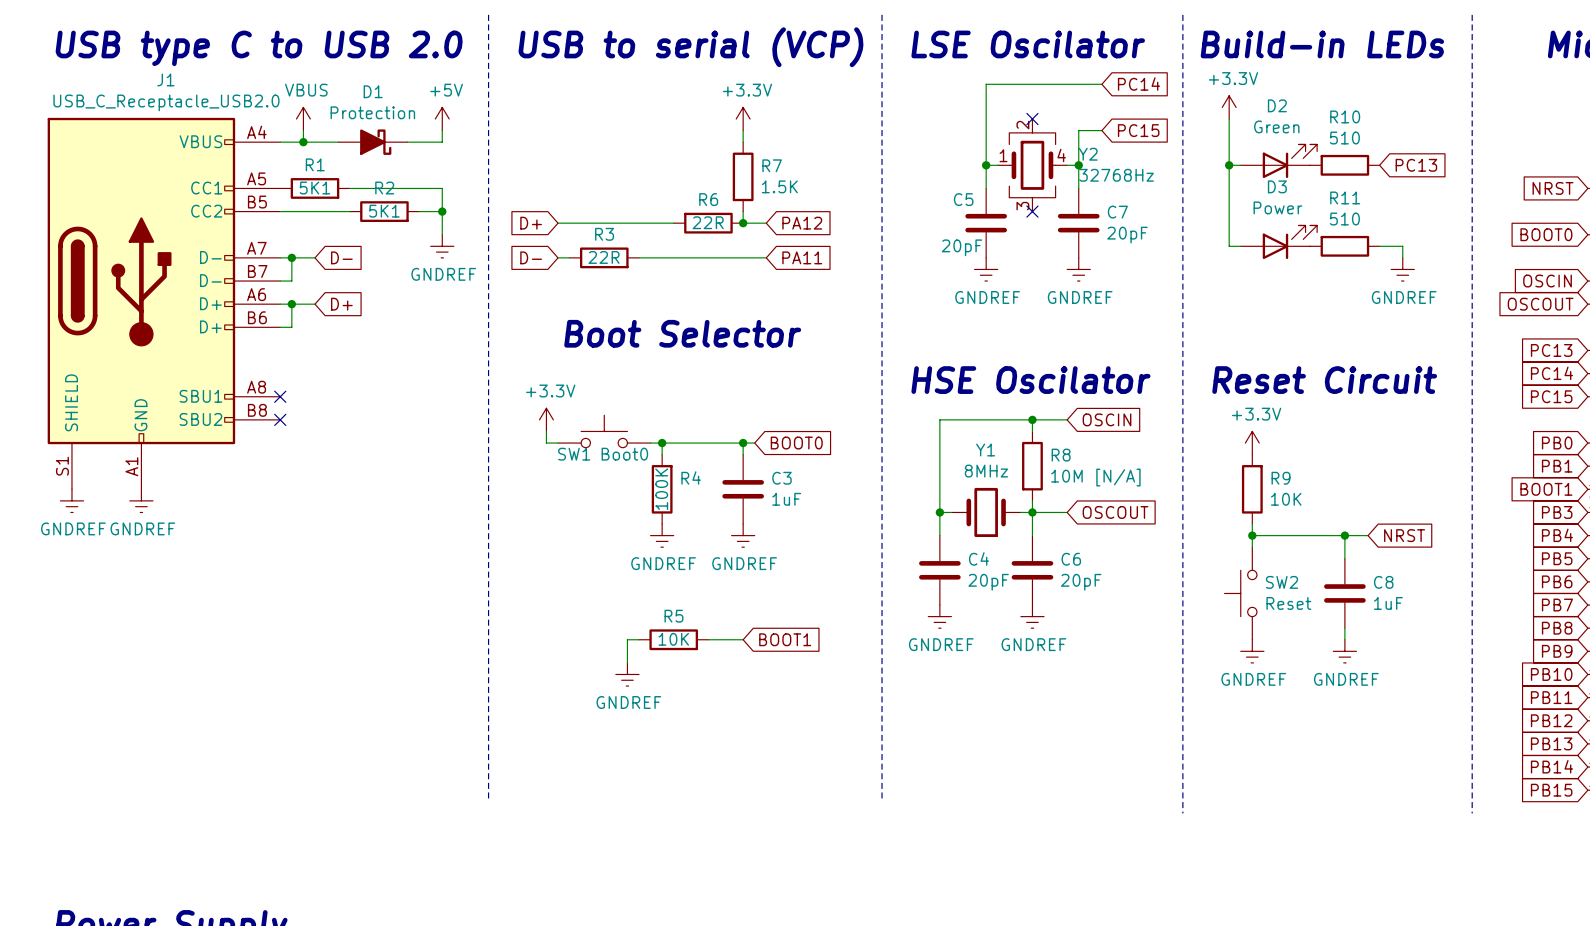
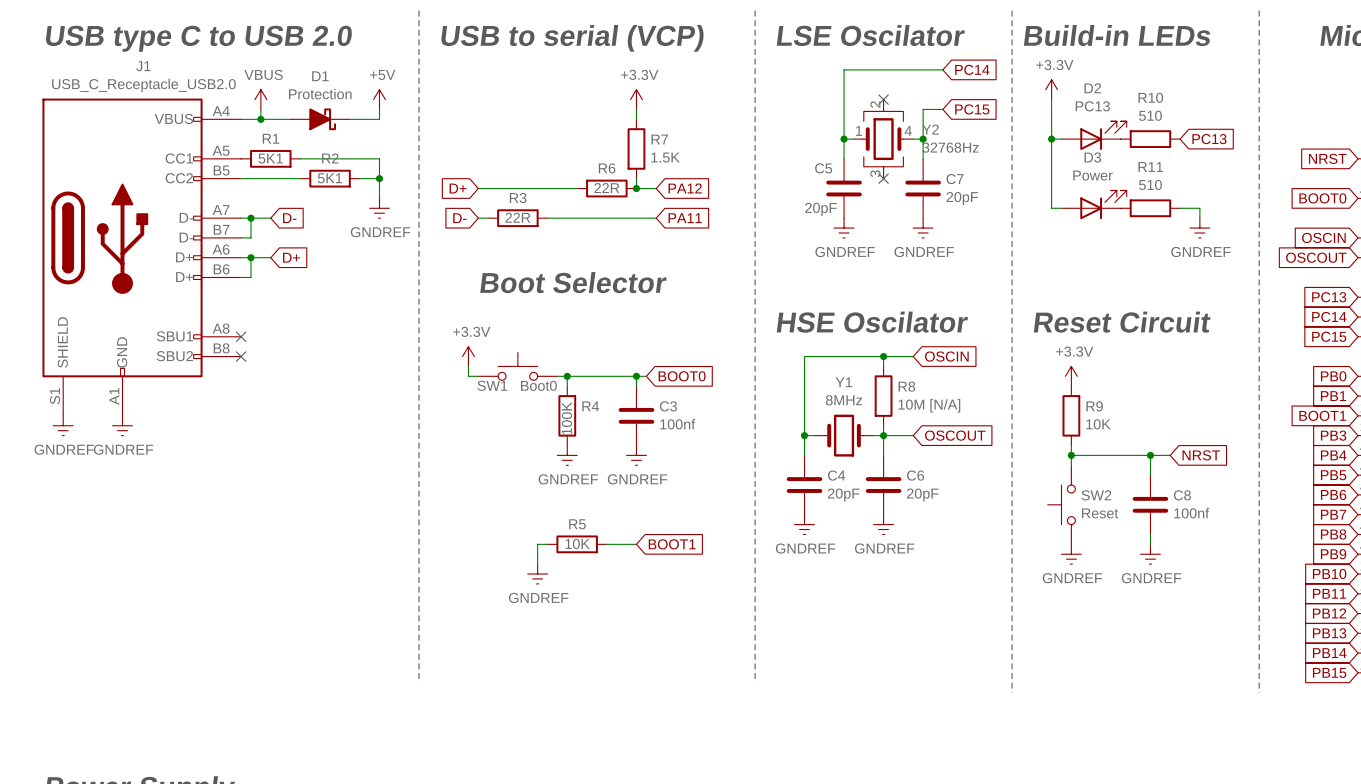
D2 value: Green (1276, 126) -> PC13 (1092, 106)
C3 value: 1uF (786, 499) -> 100nf (677, 424)
C8 value: 1uF (1388, 603) -> 100nf (1191, 513)

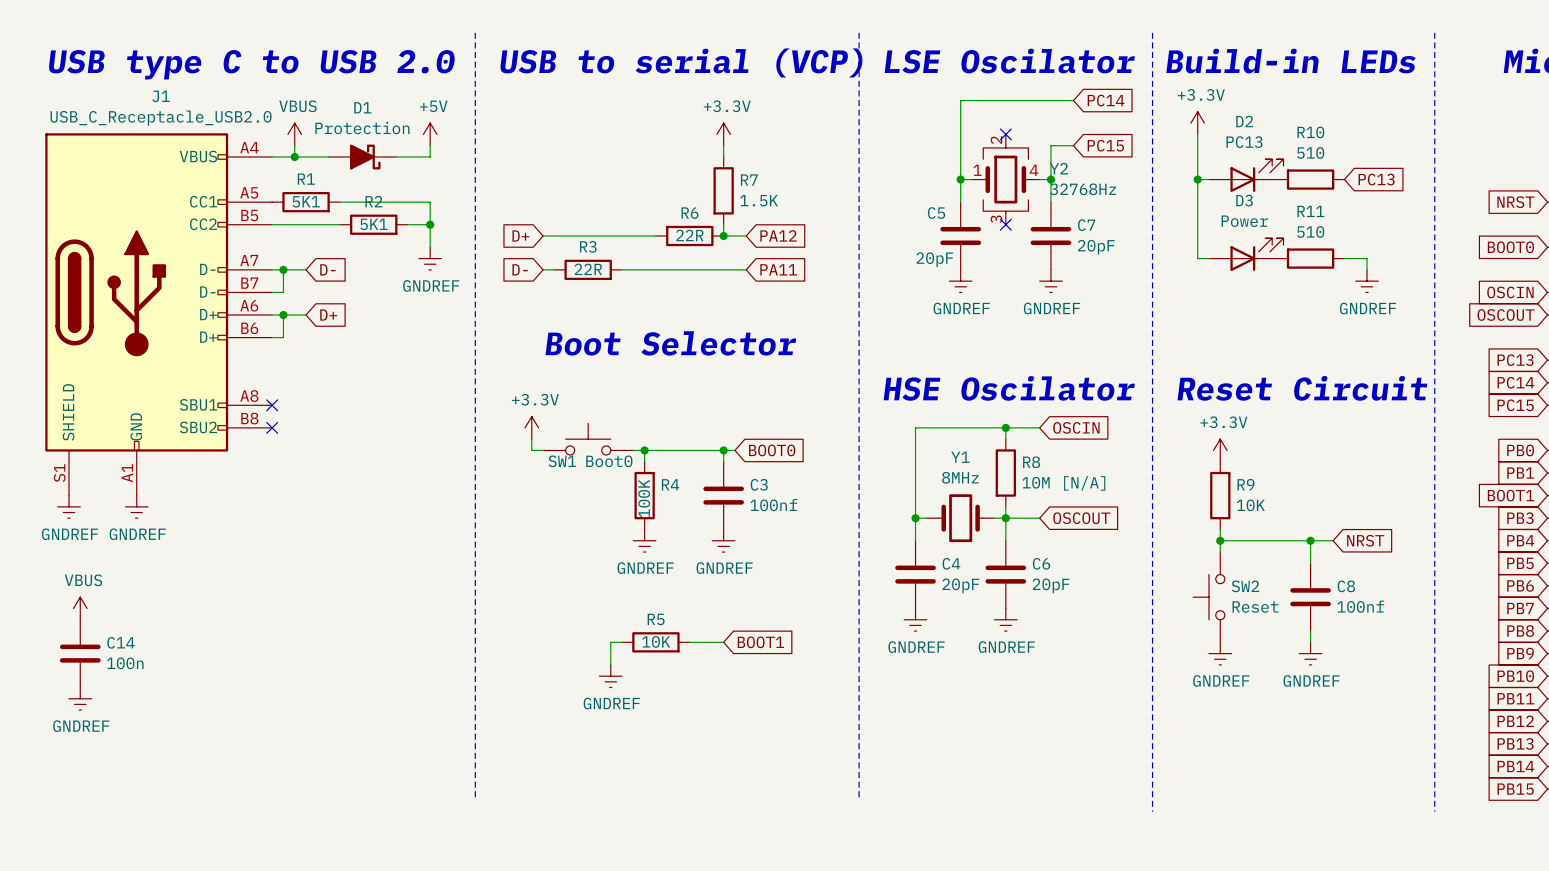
power symbol: none -> VBUS (80, 608)
C14: none -> 100n (80, 653)
power symbol: none -> GNDREF (80, 698)

